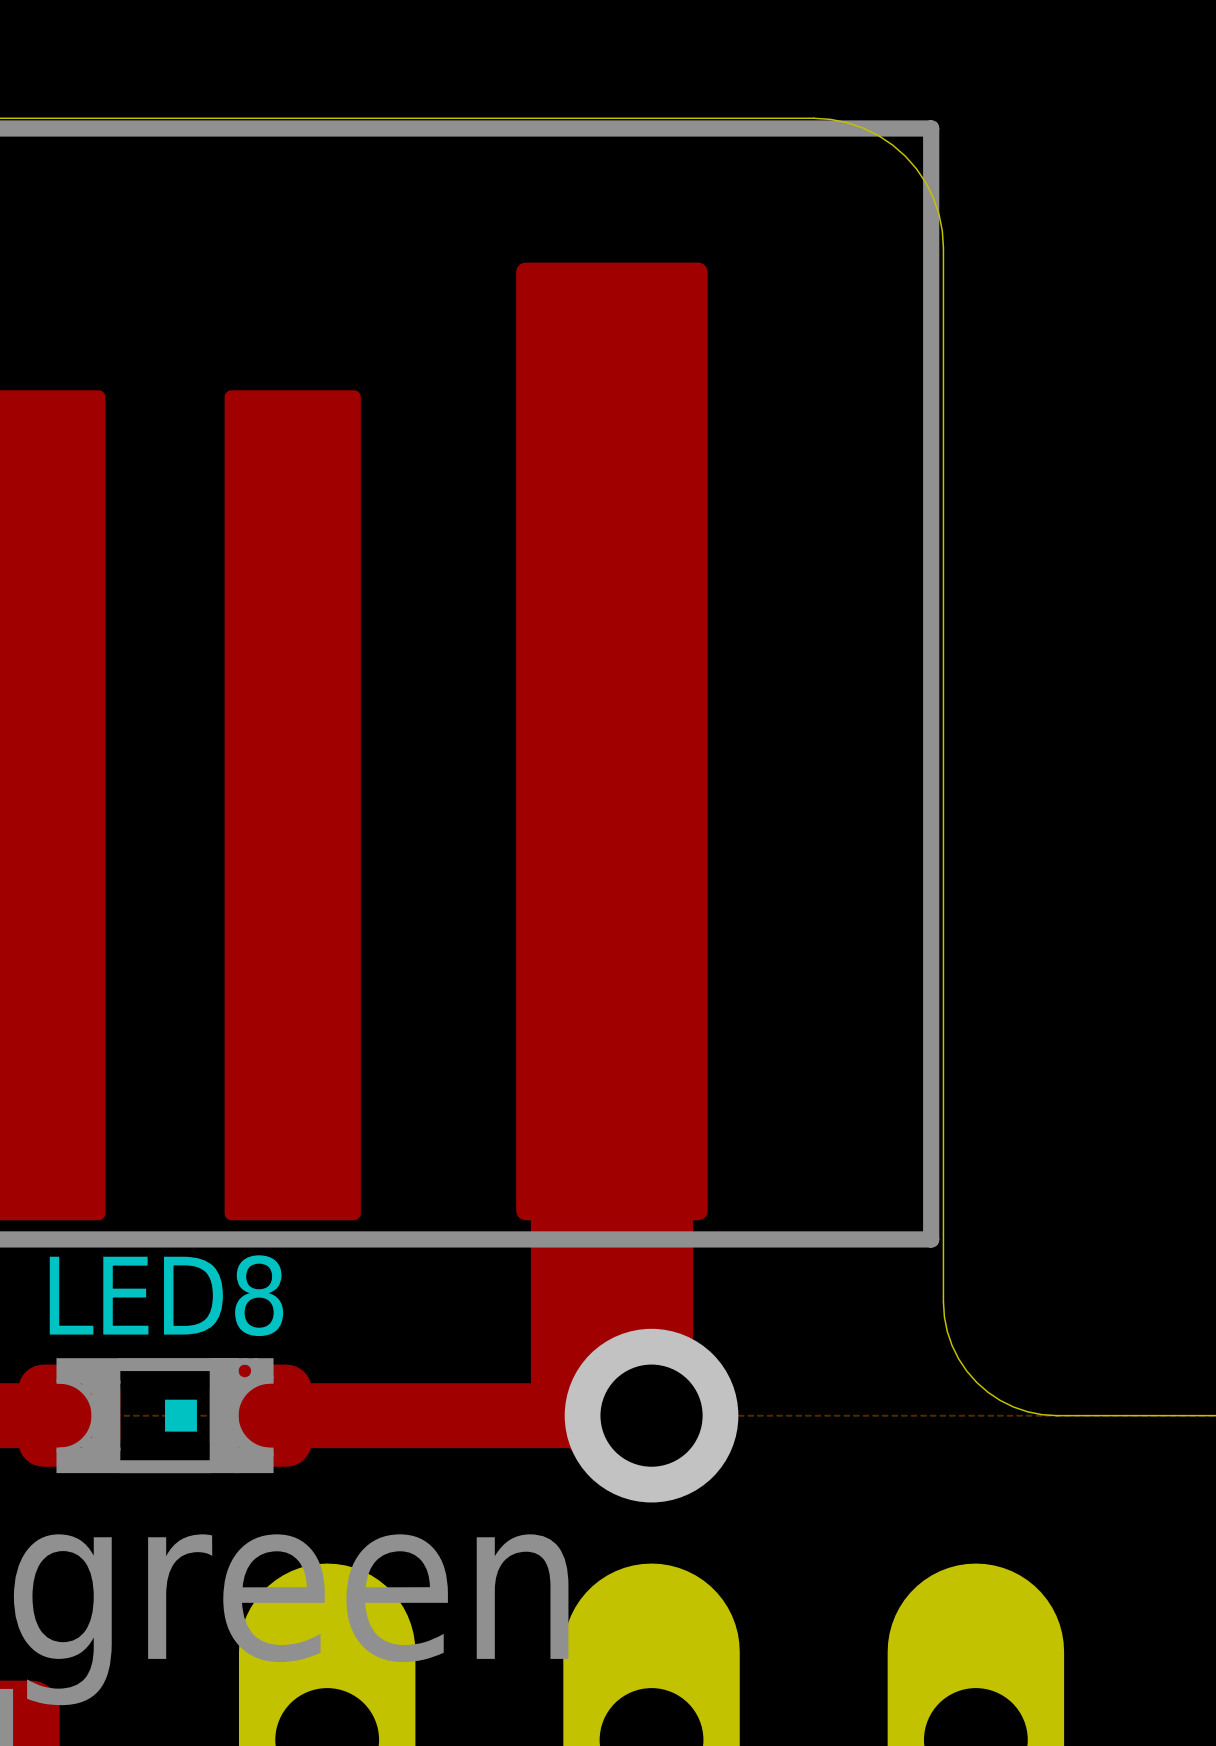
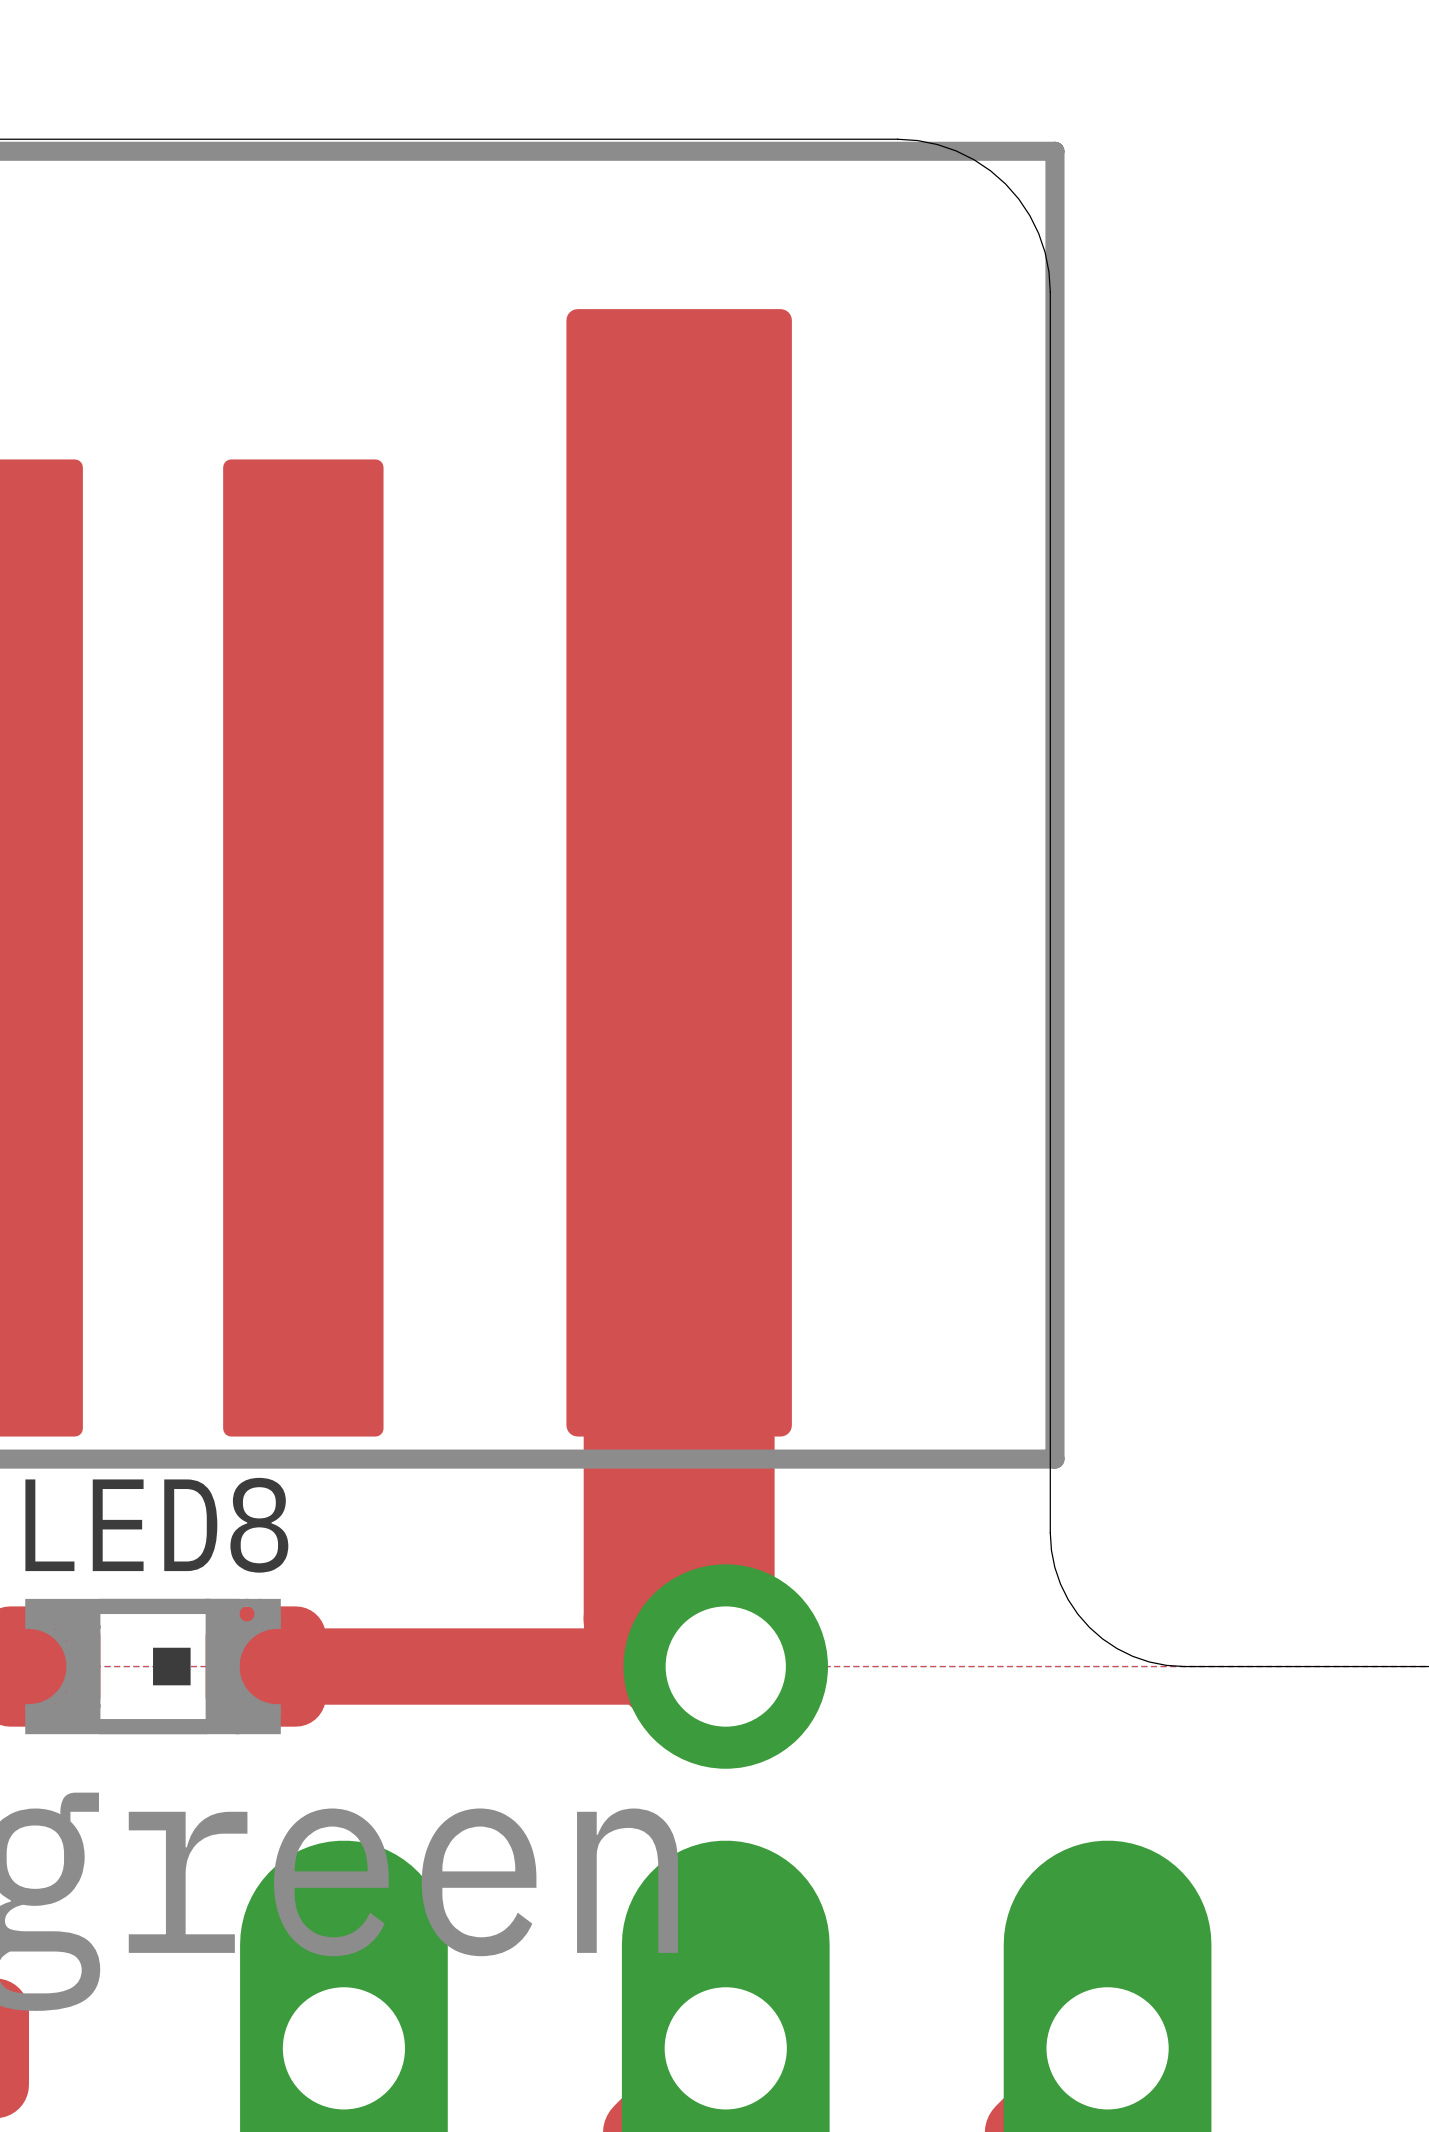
board edge: (797, 118) (830, 119) (847, 122) (878, 135) (892, 145) (905, 156) (926, 183) (939, 214) (943, 248) (944, 1316) (947, 1331) (958, 1358) (966, 1371) (987, 1392) (1000, 1400) (1027, 1411) (1056, 1415) -> (897, 139) (937, 144) (956, 150) (973, 159) (1005, 183) (1029, 215) (1038, 233) (1049, 272) (1050, 1532) (1054, 1567) (1068, 1599) (1077, 1614) (1102, 1638) (1117, 1648) (1149, 1661) (1166, 1665) (1203, 1666)

